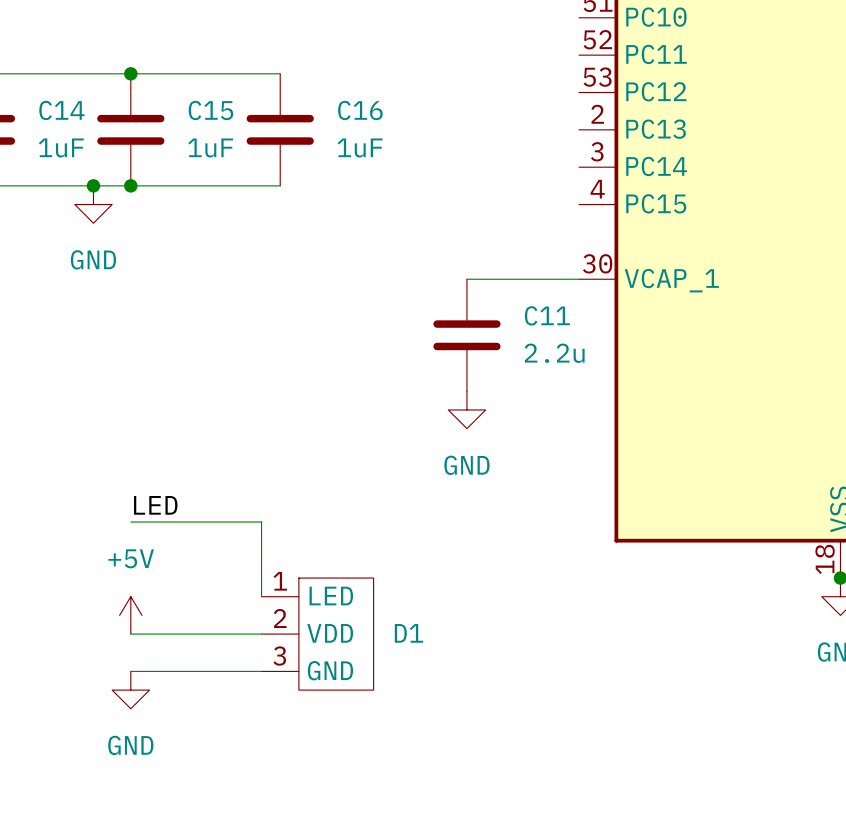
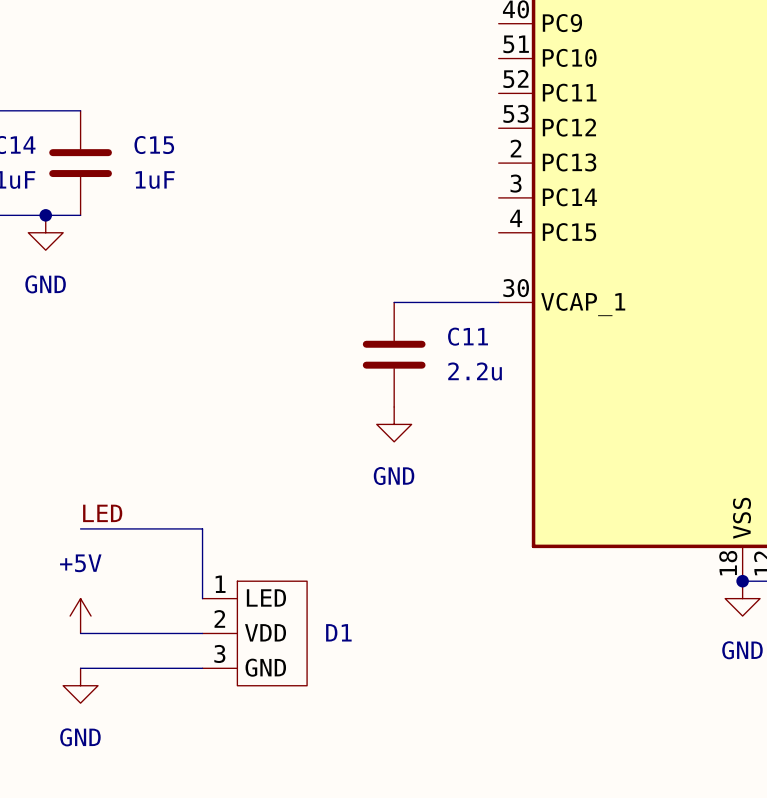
wire: (130, 73) (280, 73) -> none
junction: (130, 73) -> none
C16: 1uF (280, 129) -> none
wire: (130, 185) (280, 185) -> none
junction: (130, 185) -> none

